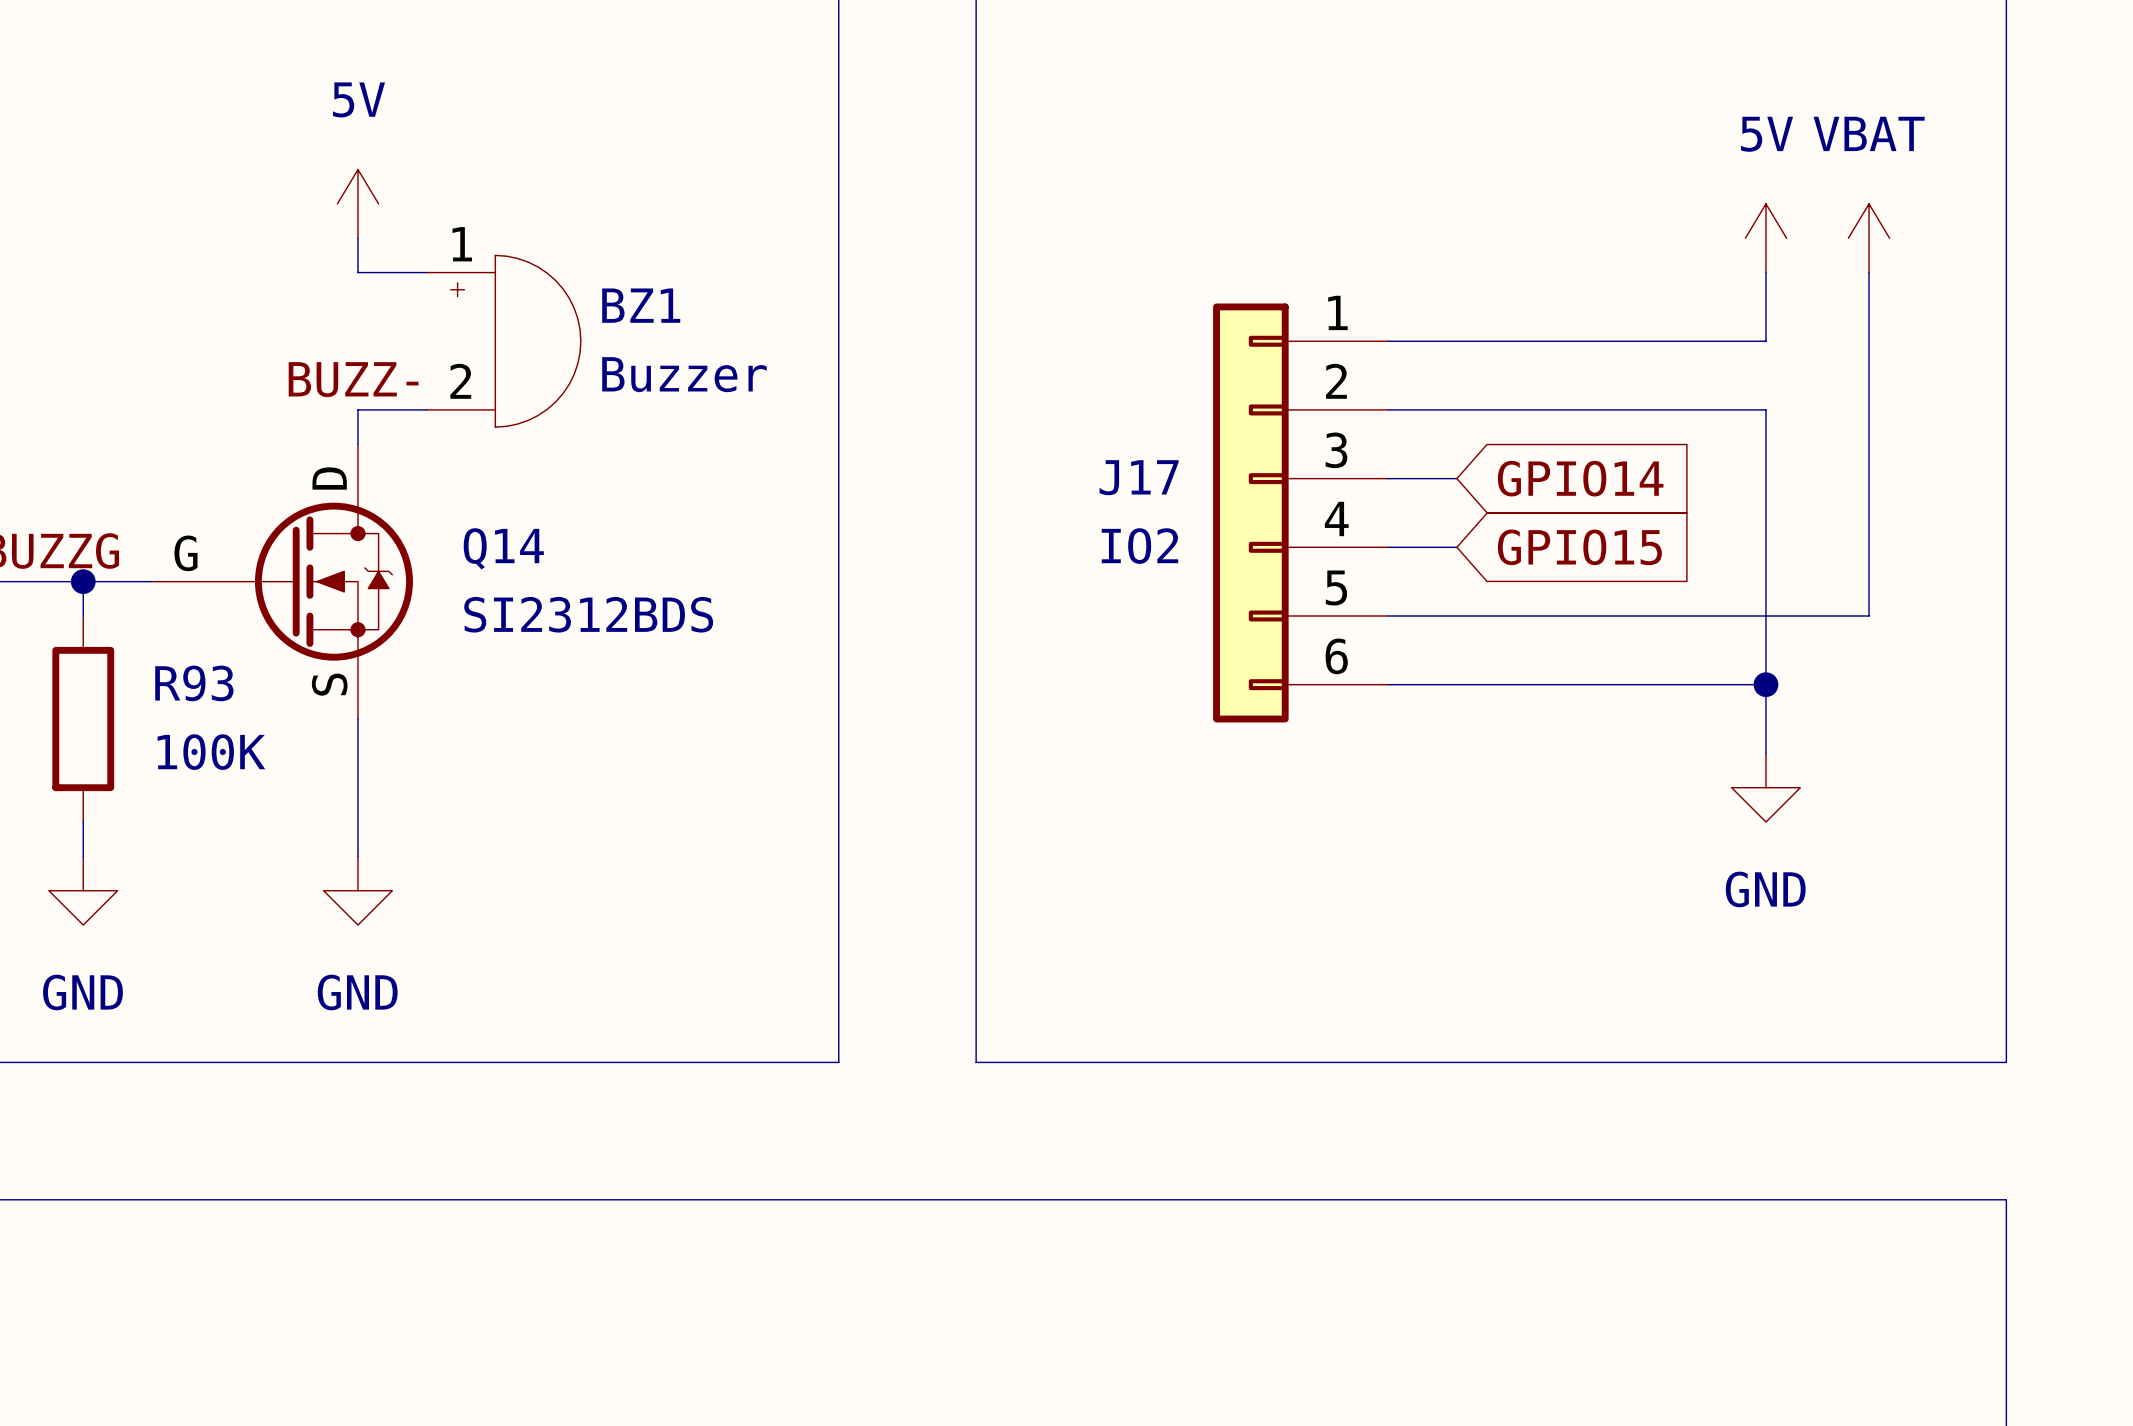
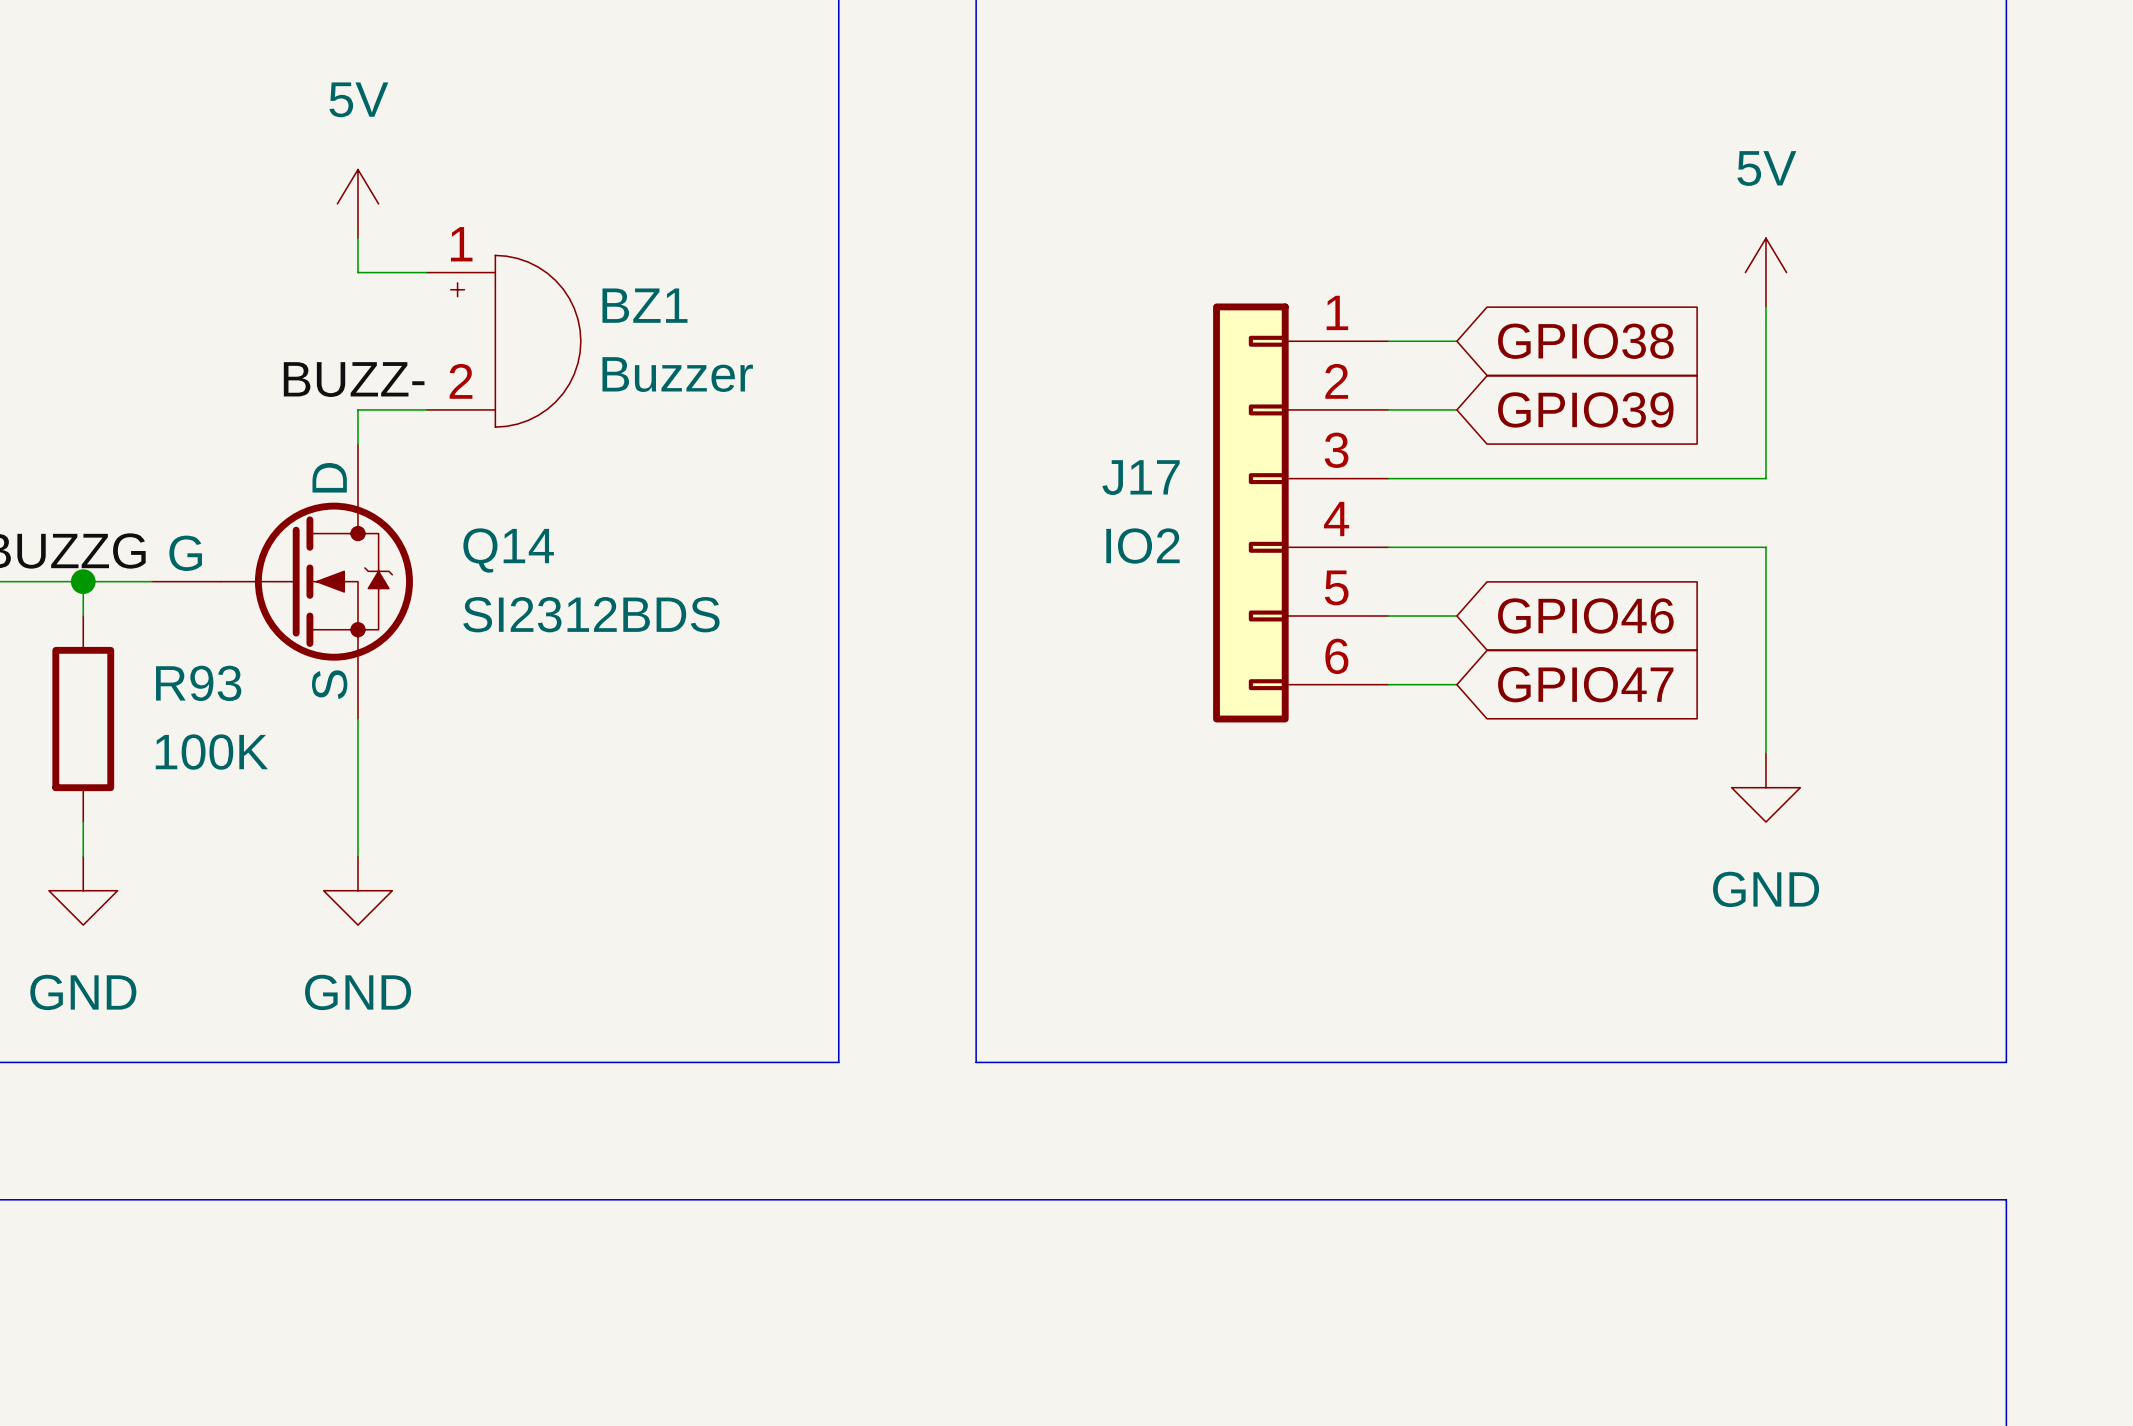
power symbol position: 5V (1765, 238) -> 5V (1765, 272)
power symbol: VBAT (1869, 238) -> none
wire: (1869, 272) (1869, 615) (1456, 615) -> none
wire: (1456, 341) (1765, 341) -> (1765, 409) (1765, 341)
global label: none -> GPIO38 (1585, 341)
wire: (1456, 409) (1765, 409) -> (1456, 547) (1765, 547)
global label: GPIO14 (1580, 478) -> GPIO39 (1585, 409)
wire: (1765, 478) (1765, 547) -> (1765, 478) (1456, 478)
global label: GPIO15 (1579, 547) -> GPIO46 (1585, 615)
wire: (1456, 684) (1765, 684) -> none
global label: none -> GPIO47 (1585, 684)
junction: (1765, 684) -> none

